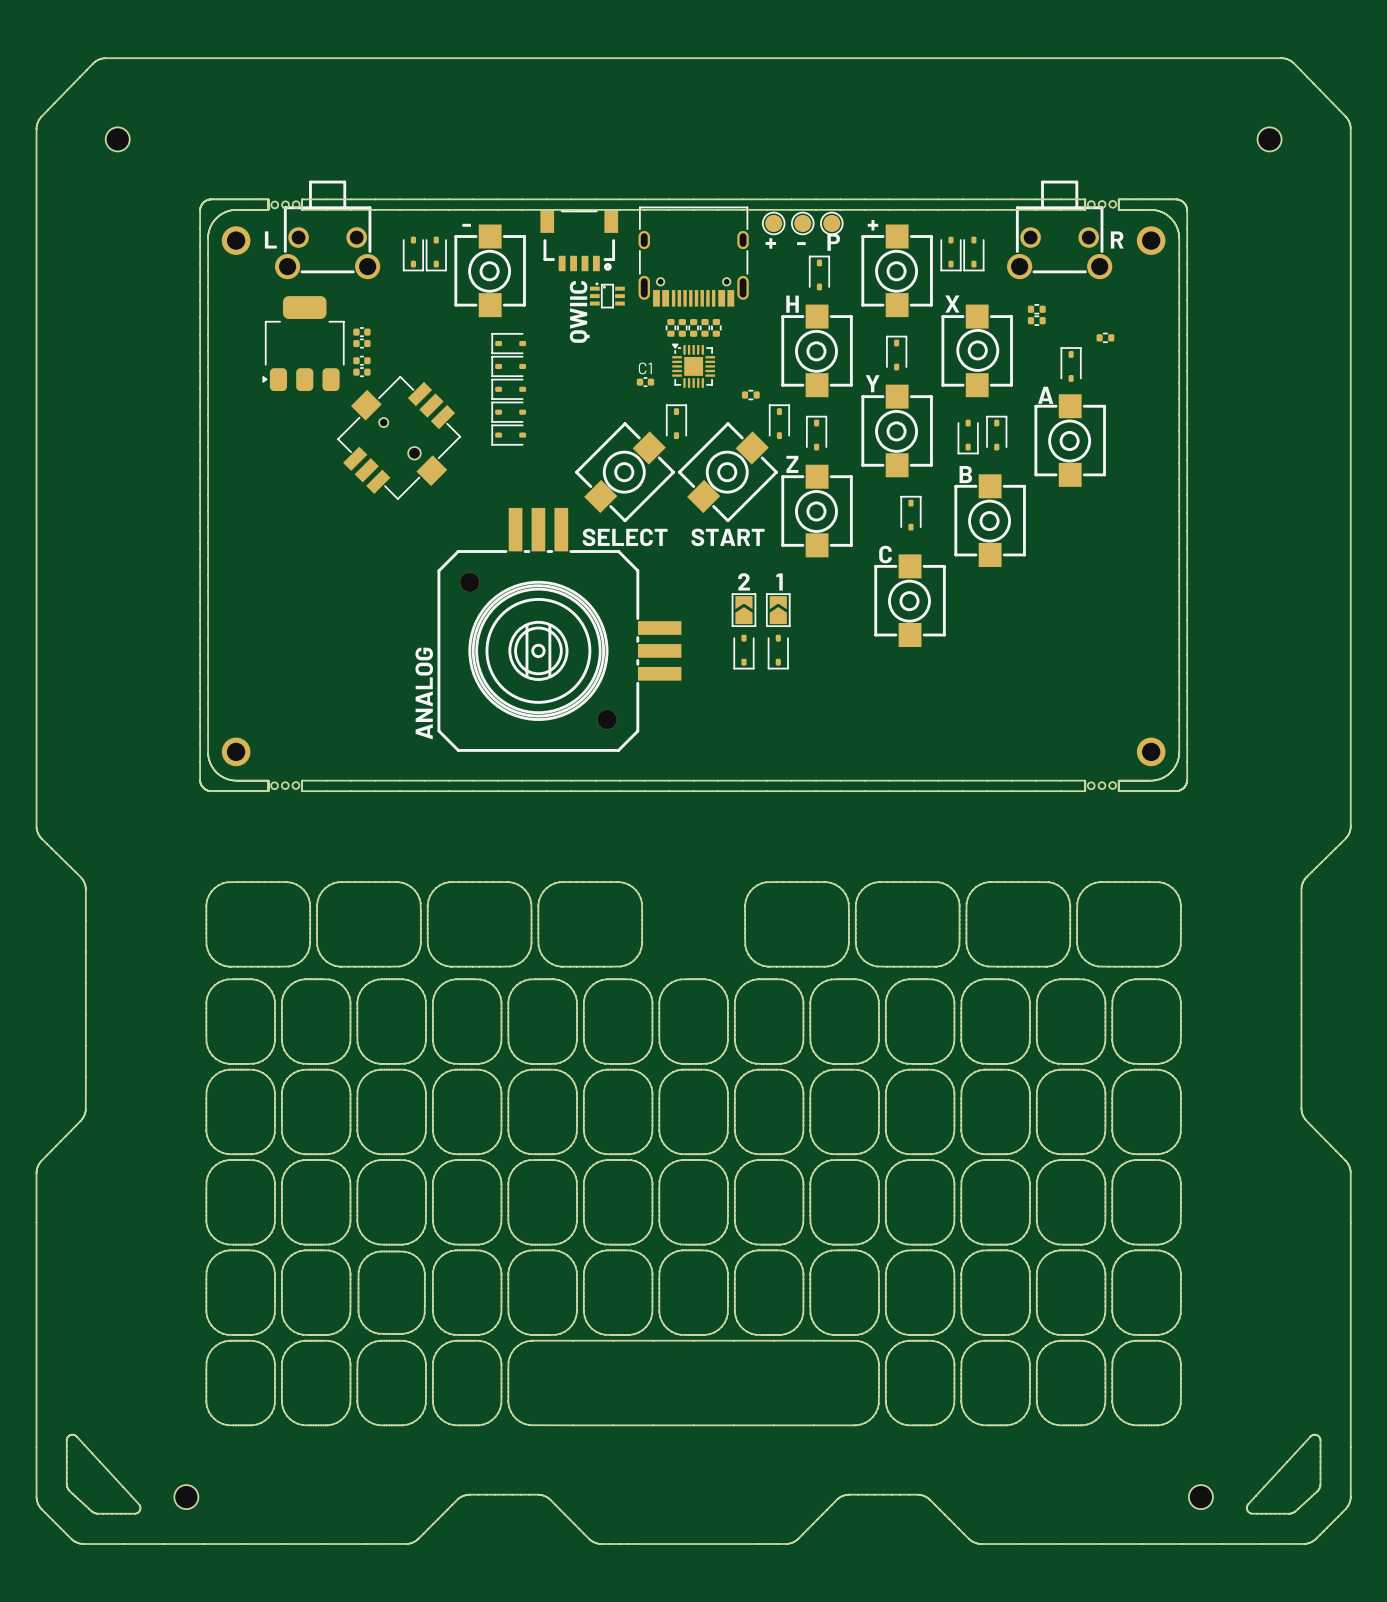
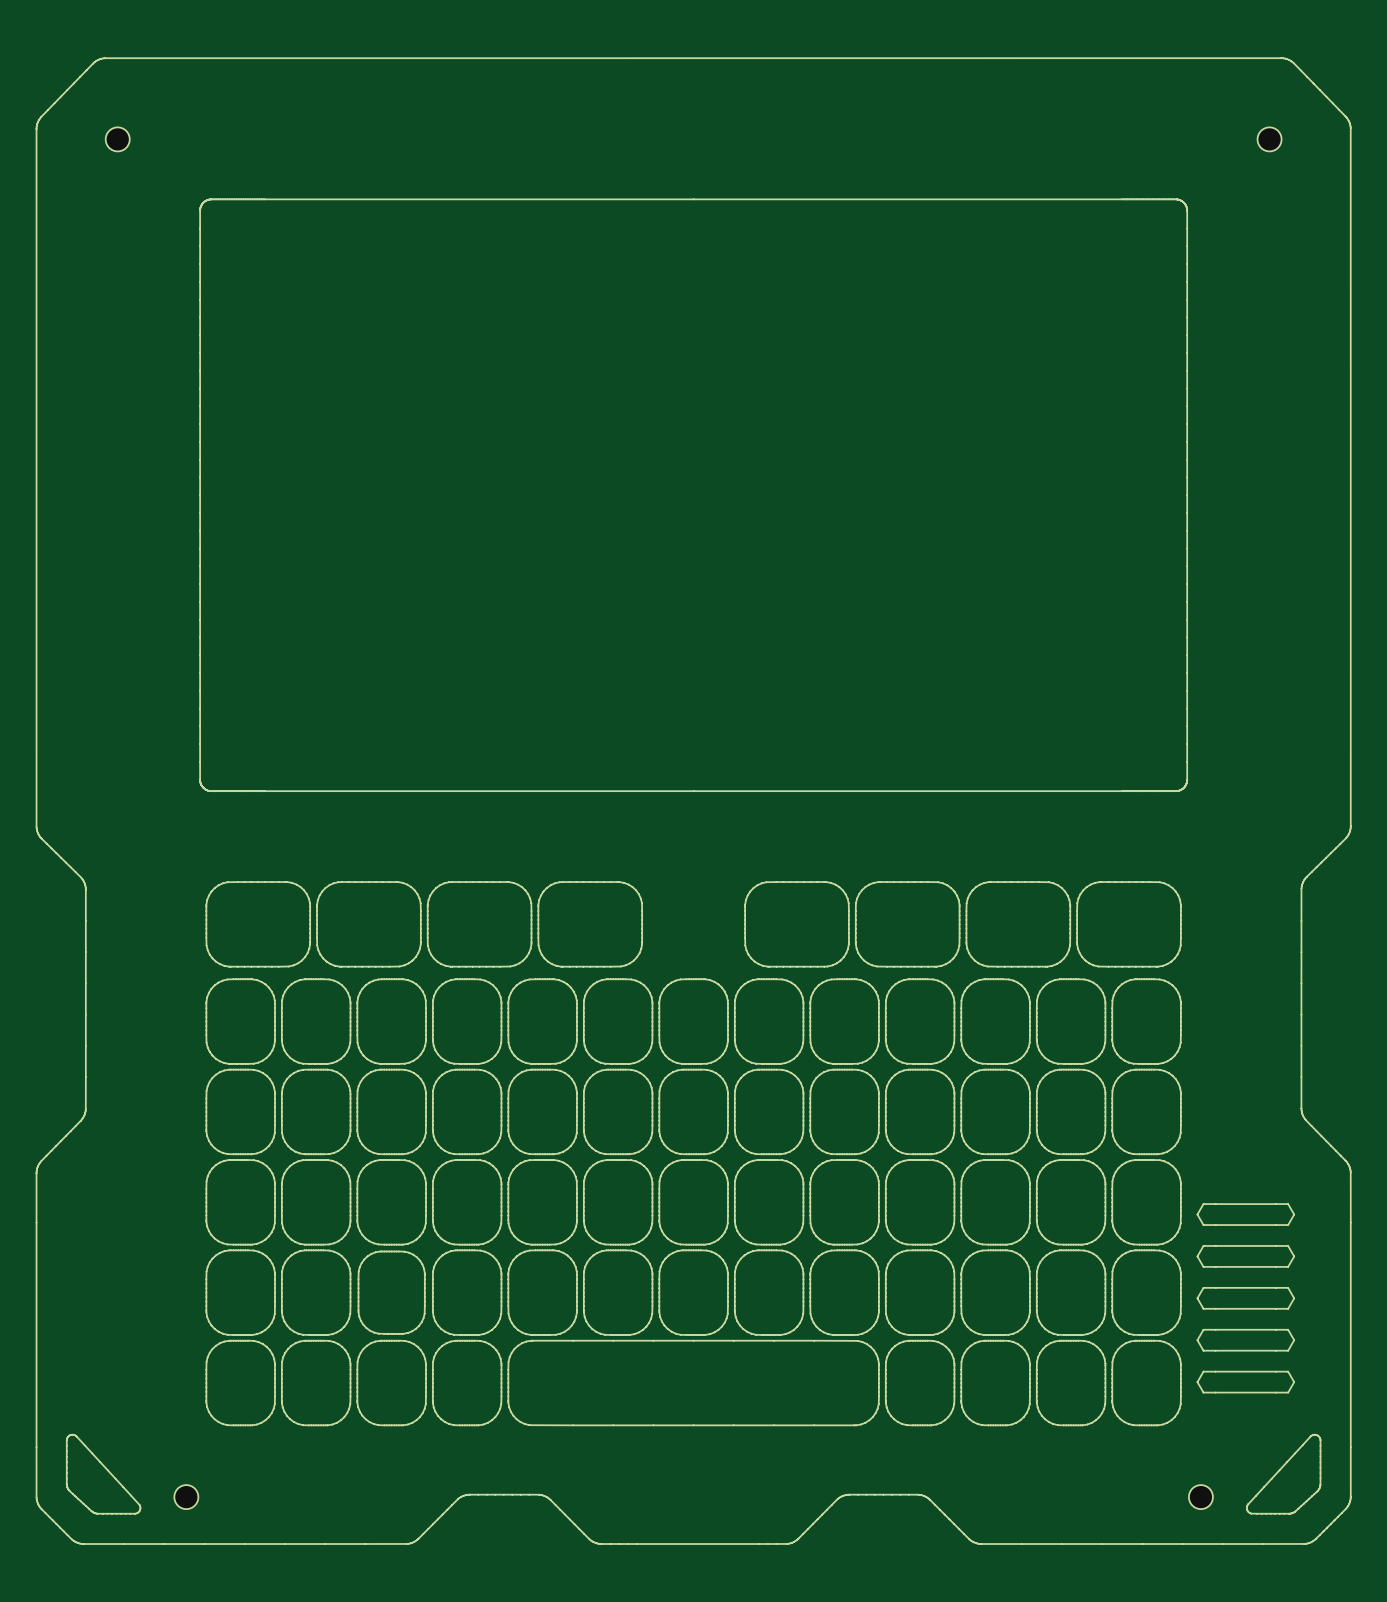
drawing shape: [35, 57, 1352, 1545] -> [35, 57, 1352, 1545]
round board edge: [270, 200, 279, 209] -> none
round board edge: [281, 200, 290, 209] -> none
round board edge: [292, 200, 301, 209] -> none
round board edge: [1087, 200, 1096, 209] -> none
round board edge: [1098, 200, 1107, 209] -> none
round board edge: [1108, 200, 1117, 209] -> none
part: (773, 223) -> none
part: (802, 223) -> none
part: (831, 223) -> none
text: - (466, 225) -> none
text: + (873, 225) -> none
part: (327, 229) -> none
part: (1059, 229) -> none
text: L (270, 239) -> none
text: R (1117, 239) -> none
part: (236, 240) -> none
part: (579, 240) -> none
part: (1151, 240) -> none
text: + - P (802, 242) -> none
part: (413, 253) -> none
part: (436, 253) -> none
part: (951, 253) -> none
part: (973, 253) -> none
part: (693, 256) -> none
part: (490, 270) -> none
part: (897, 270) -> none
part: (819, 273) -> none
part: (607, 295) -> none
text: H (792, 304) -> none
text: X (952, 304) -> none
part: (1036, 309) -> none
text: QWIIC (579, 311) -> none
part: (1036, 320) -> none
part: (670, 327) -> none
part: (682, 327) -> none
part: (693, 327) -> none
part: (705, 327) -> none
part: (716, 327) -> none
part: (361, 332) -> none
part: (1105, 337) -> none
part: (303, 343) -> none
part: (361, 343) -> none
part: (508, 343) -> none
part: (817, 350) -> none
part: (977, 350) -> none
part: (896, 353) -> none
part: (361, 360) -> none
part: (1071, 364) -> none
part: (693, 365) -> none
part: (508, 366) -> none
part: (361, 372) -> none
C1: (645, 382) -> none
text: Y (872, 383) -> none
part: (508, 389) -> none
part: (750, 395) -> none
text: A (1045, 395) -> none
part: (508, 412) -> none
part: (676, 421) -> none
part: (779, 421) -> none
part: (897, 430) -> none
part: (816, 433) -> none
part: (996, 433) -> none
part: (508, 435) -> none
part: (968, 436) -> none
part: (399, 437) -> none
part: (1070, 440) -> none
text: Z (792, 464) -> none
part: (625, 472) -> none
part: (727, 472) -> none
text: B (965, 474) -> none
part: (817, 511) -> none
part: (910, 513) -> none
part: (990, 520) -> none
text: SELECT (625, 537) -> none
text: START (728, 537) -> none
text: C (885, 554) -> none
text: 2 1 (760, 581) -> none
part: (910, 600) -> none
part: (743, 610) -> none
part: (778, 610) -> none
part: (559, 629) -> none
part: (743, 651) -> none
part: (778, 651) -> none
text: ANALOG (424, 693) -> none
part: (236, 751) -> none
part: (1151, 751) -> none
round board edge: [270, 781, 279, 790] -> none
round board edge: [281, 781, 290, 790] -> none
round board edge: [291, 781, 300, 790] -> none
round board edge: [1087, 781, 1096, 790] -> none
round board edge: [1097, 781, 1106, 790] -> none
round board edge: [1108, 781, 1117, 790] -> none

